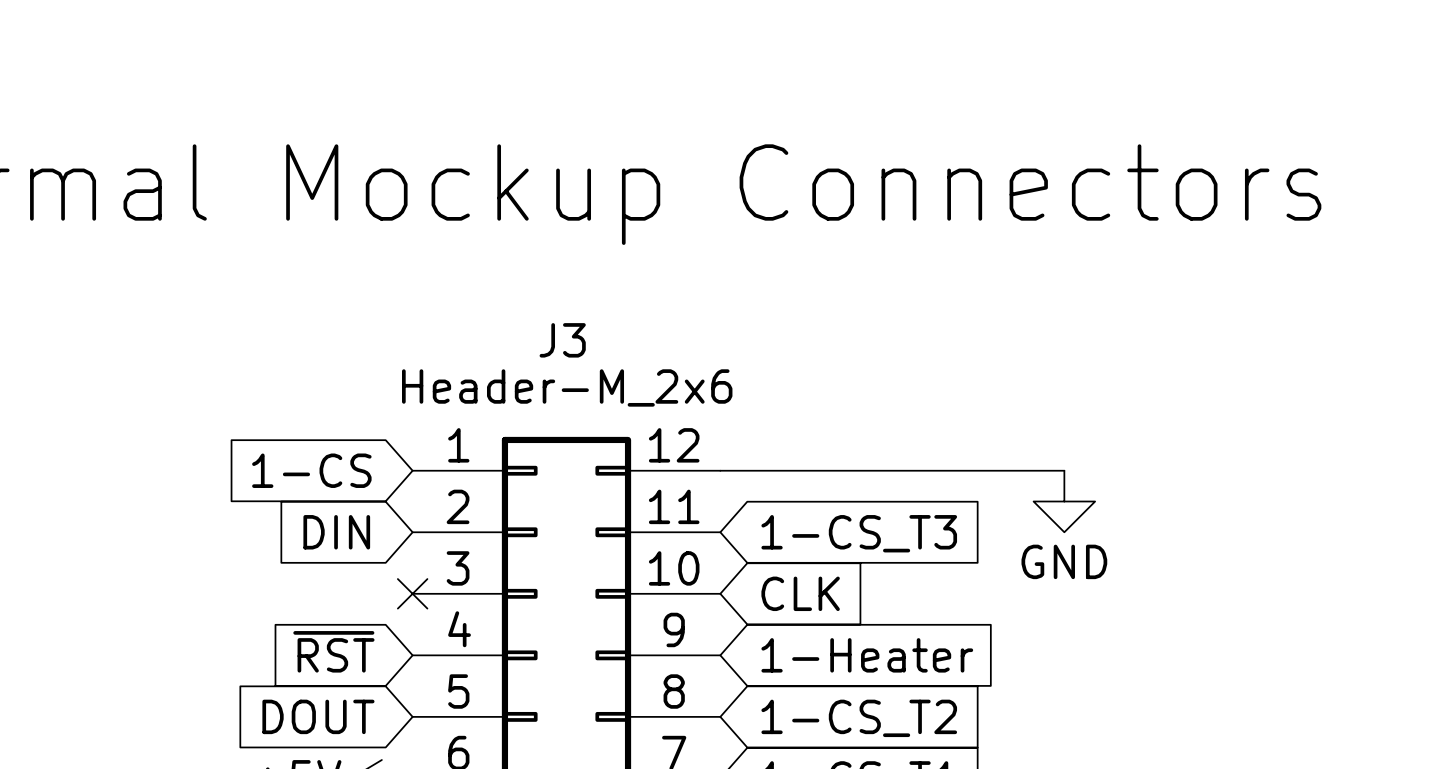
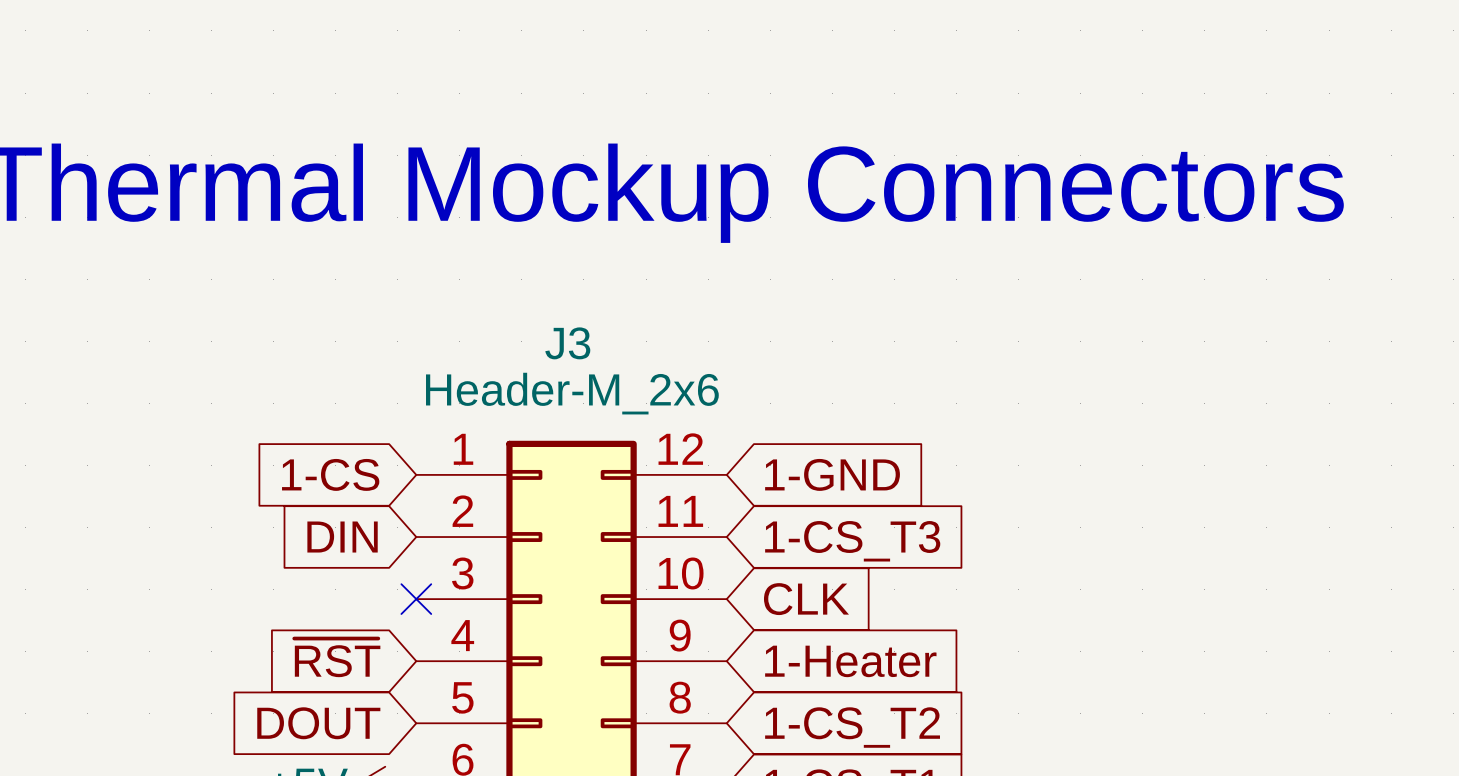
wire: (720, 470) (1064, 470) -> none
global label: none -> 1-GND (832, 474)
power symbol: GND (1064, 501) -> none

